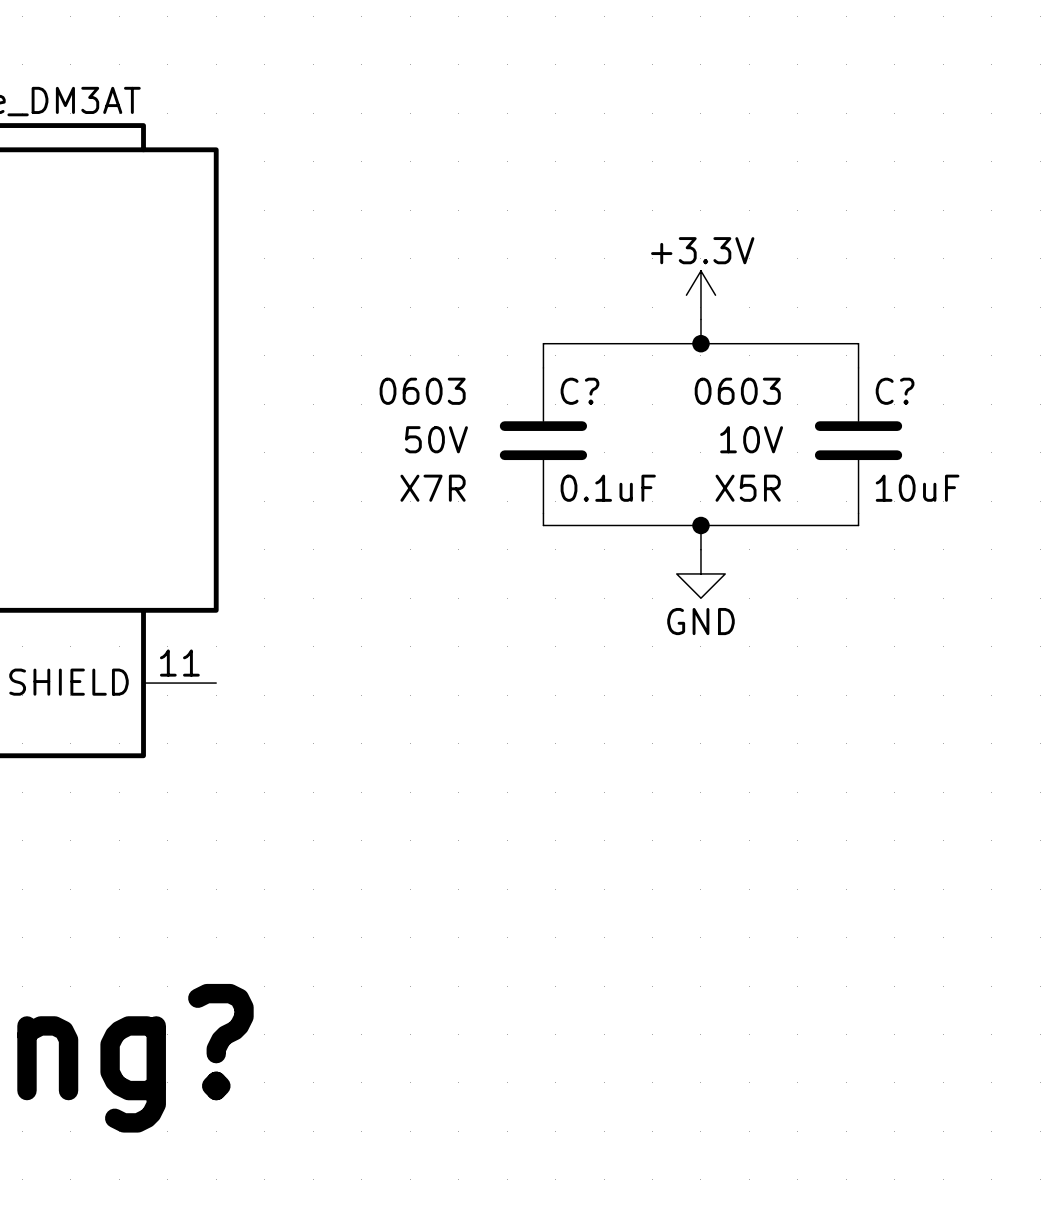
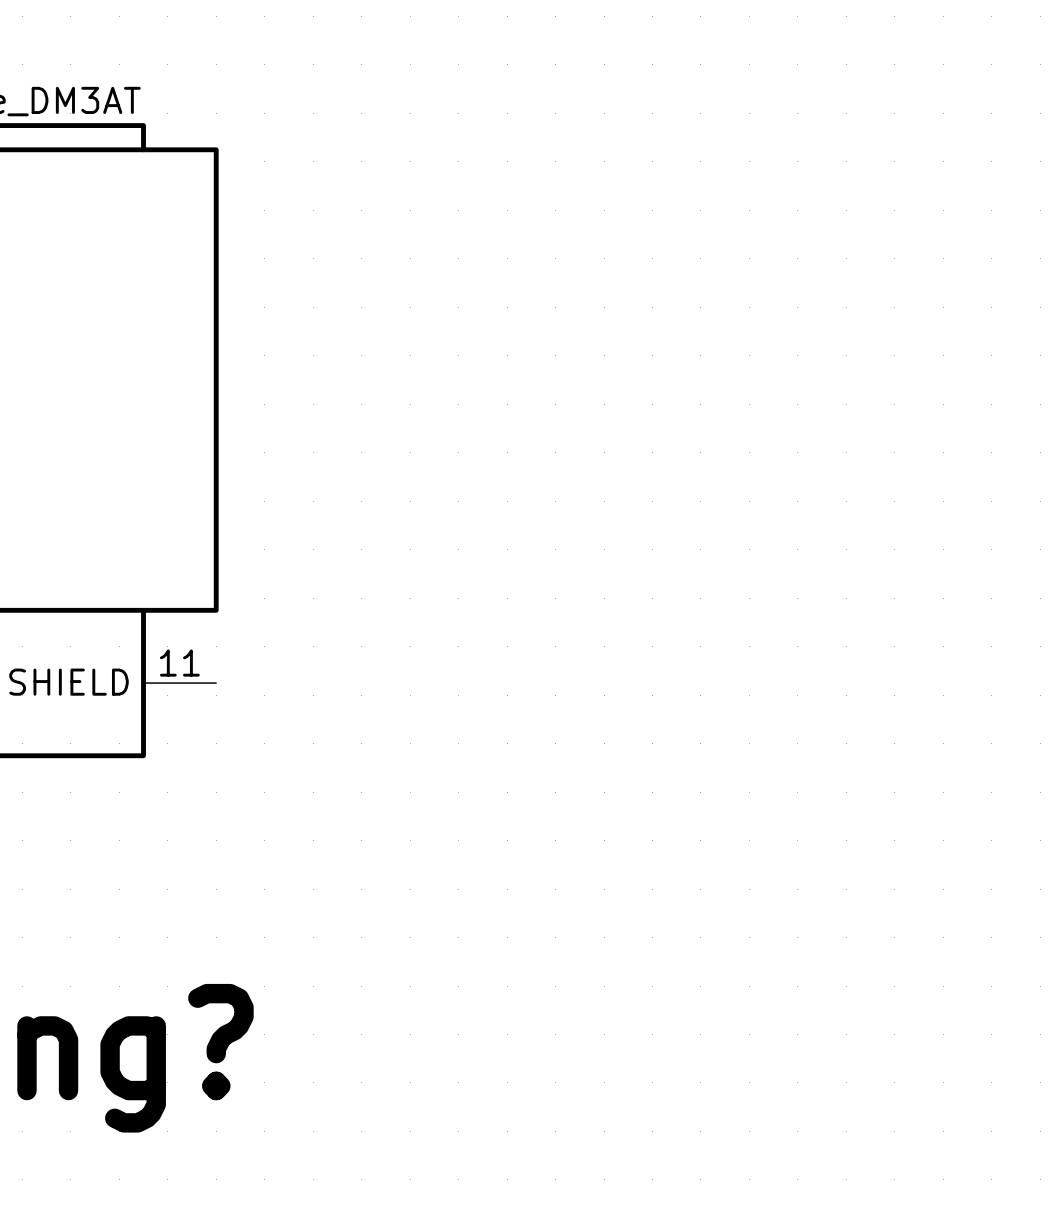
power symbol: +3.3V (700, 295) -> none
wire: (700, 319) (700, 343) -> none
junction: (700, 343) -> none
wire: (543, 367) (543, 343) (858, 343) (858, 367) -> none
C?: 0.1uF (543, 440) -> none
C?: 10uF (858, 440) -> none
wire: (543, 513) (543, 525) (858, 525) (858, 513) -> none
wire: (700, 525) (700, 549) -> none
junction: (700, 525) -> none
power symbol: GND (700, 573) -> none

